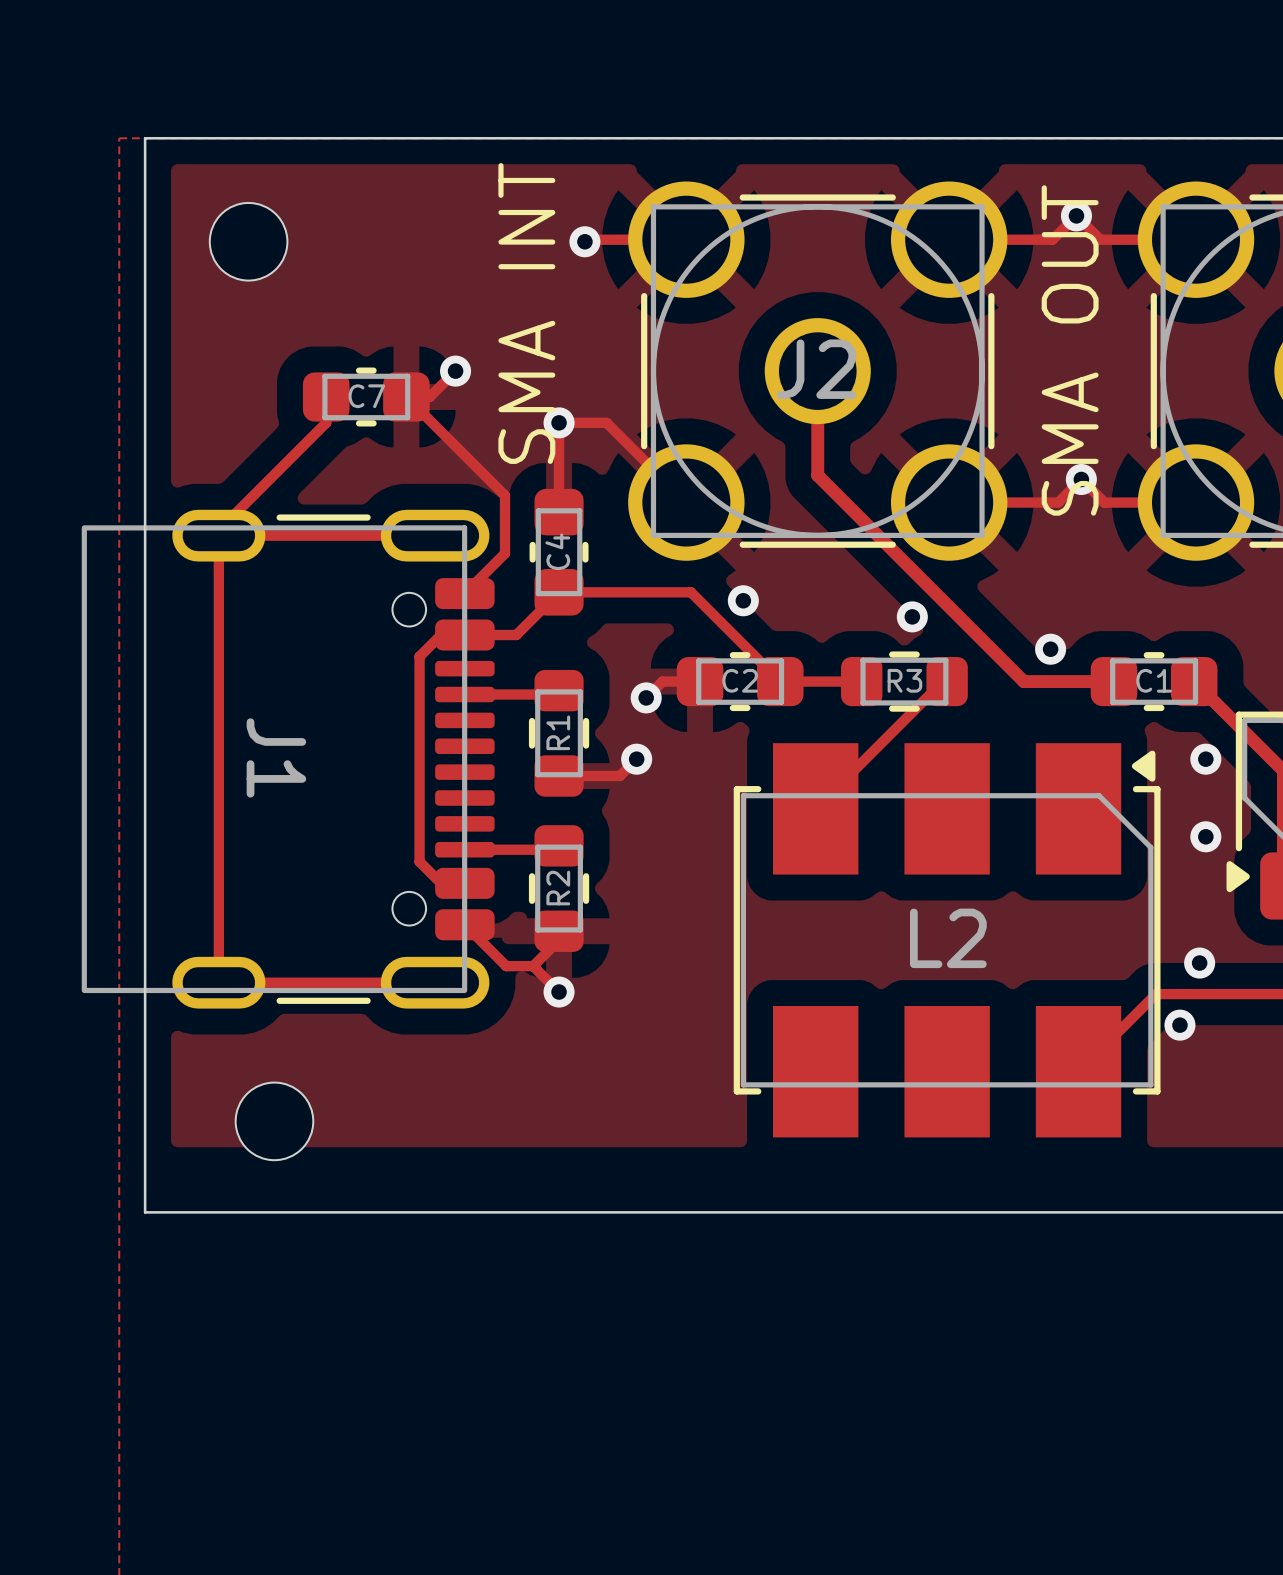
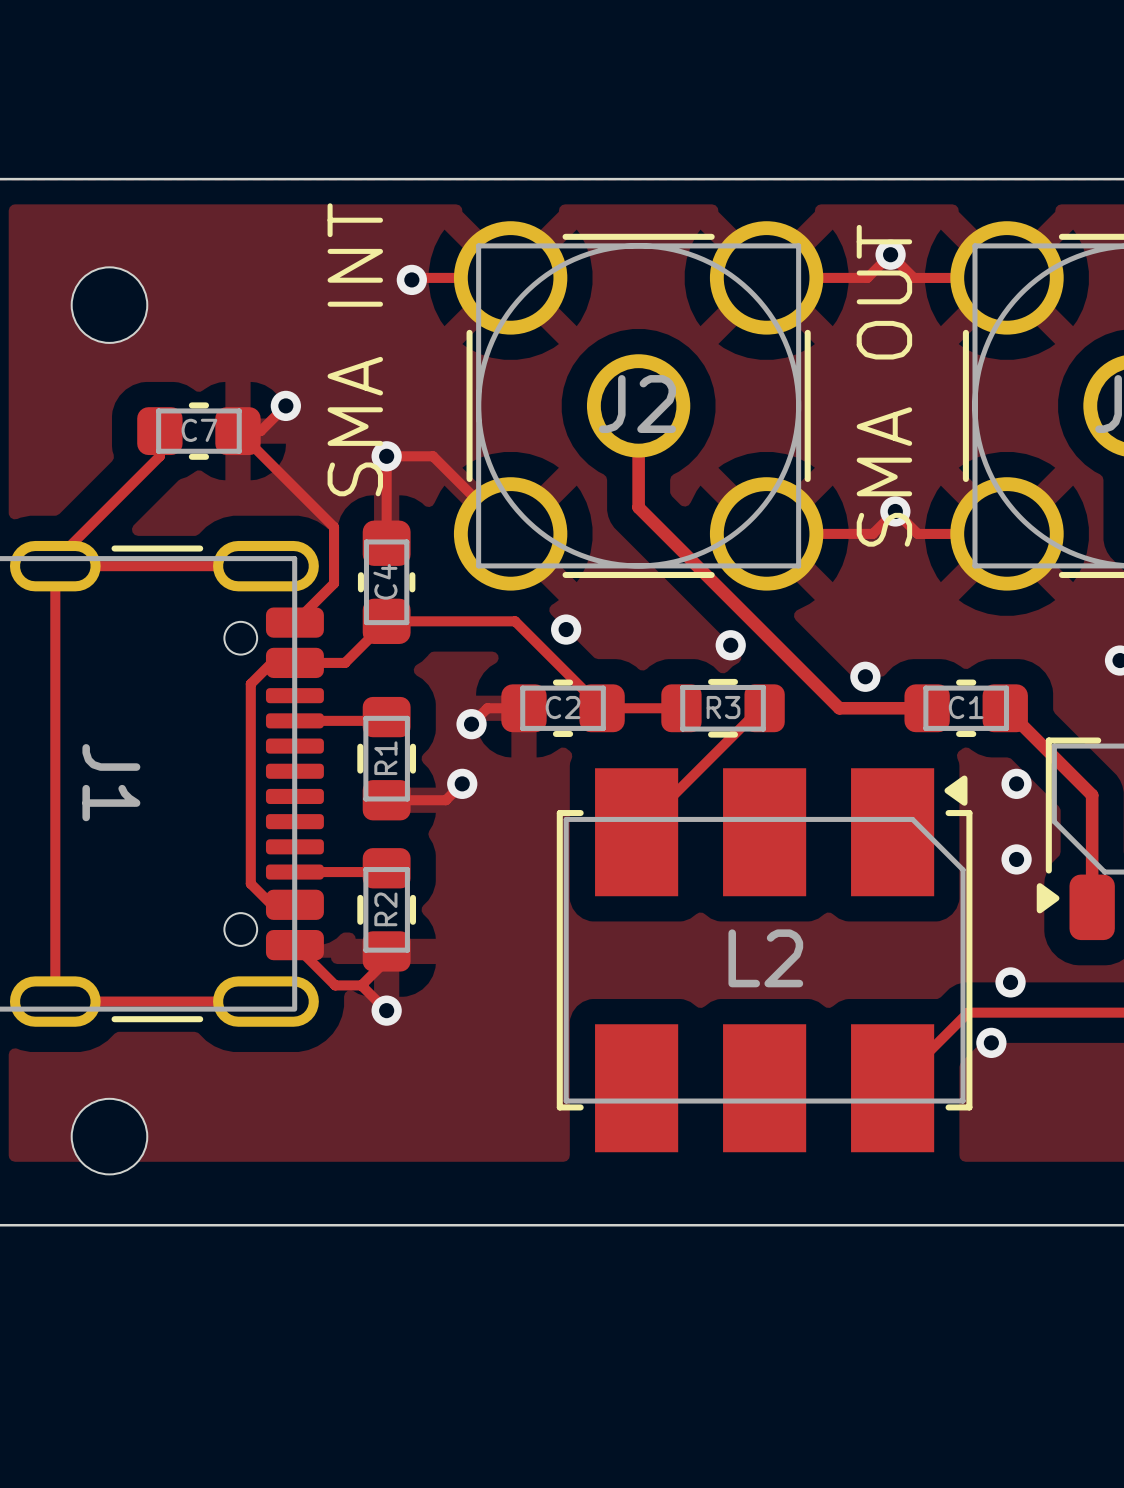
part position: (248, 241) -> (109, 305)

